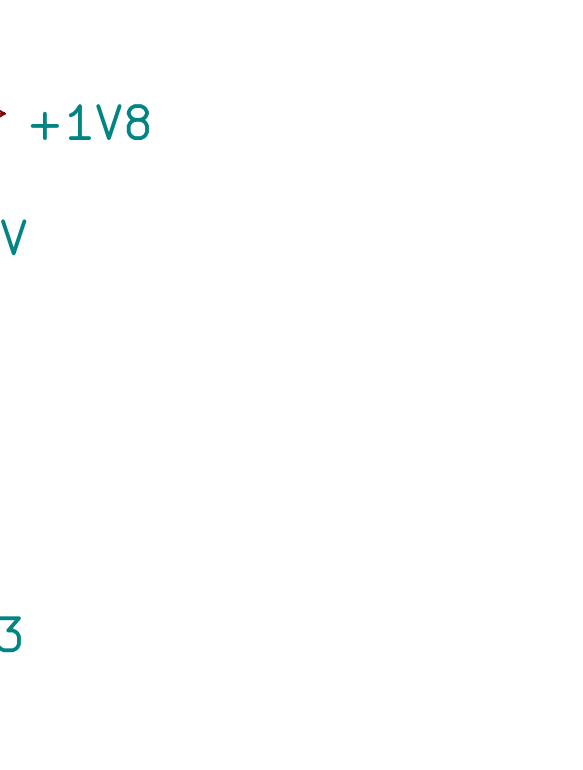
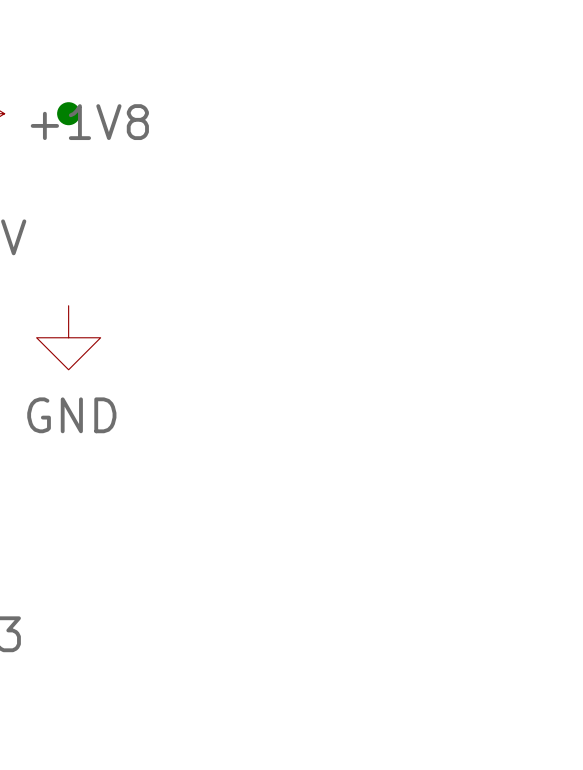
junction: none -> (68, 113)
power symbol: none -> GND (68, 337)

